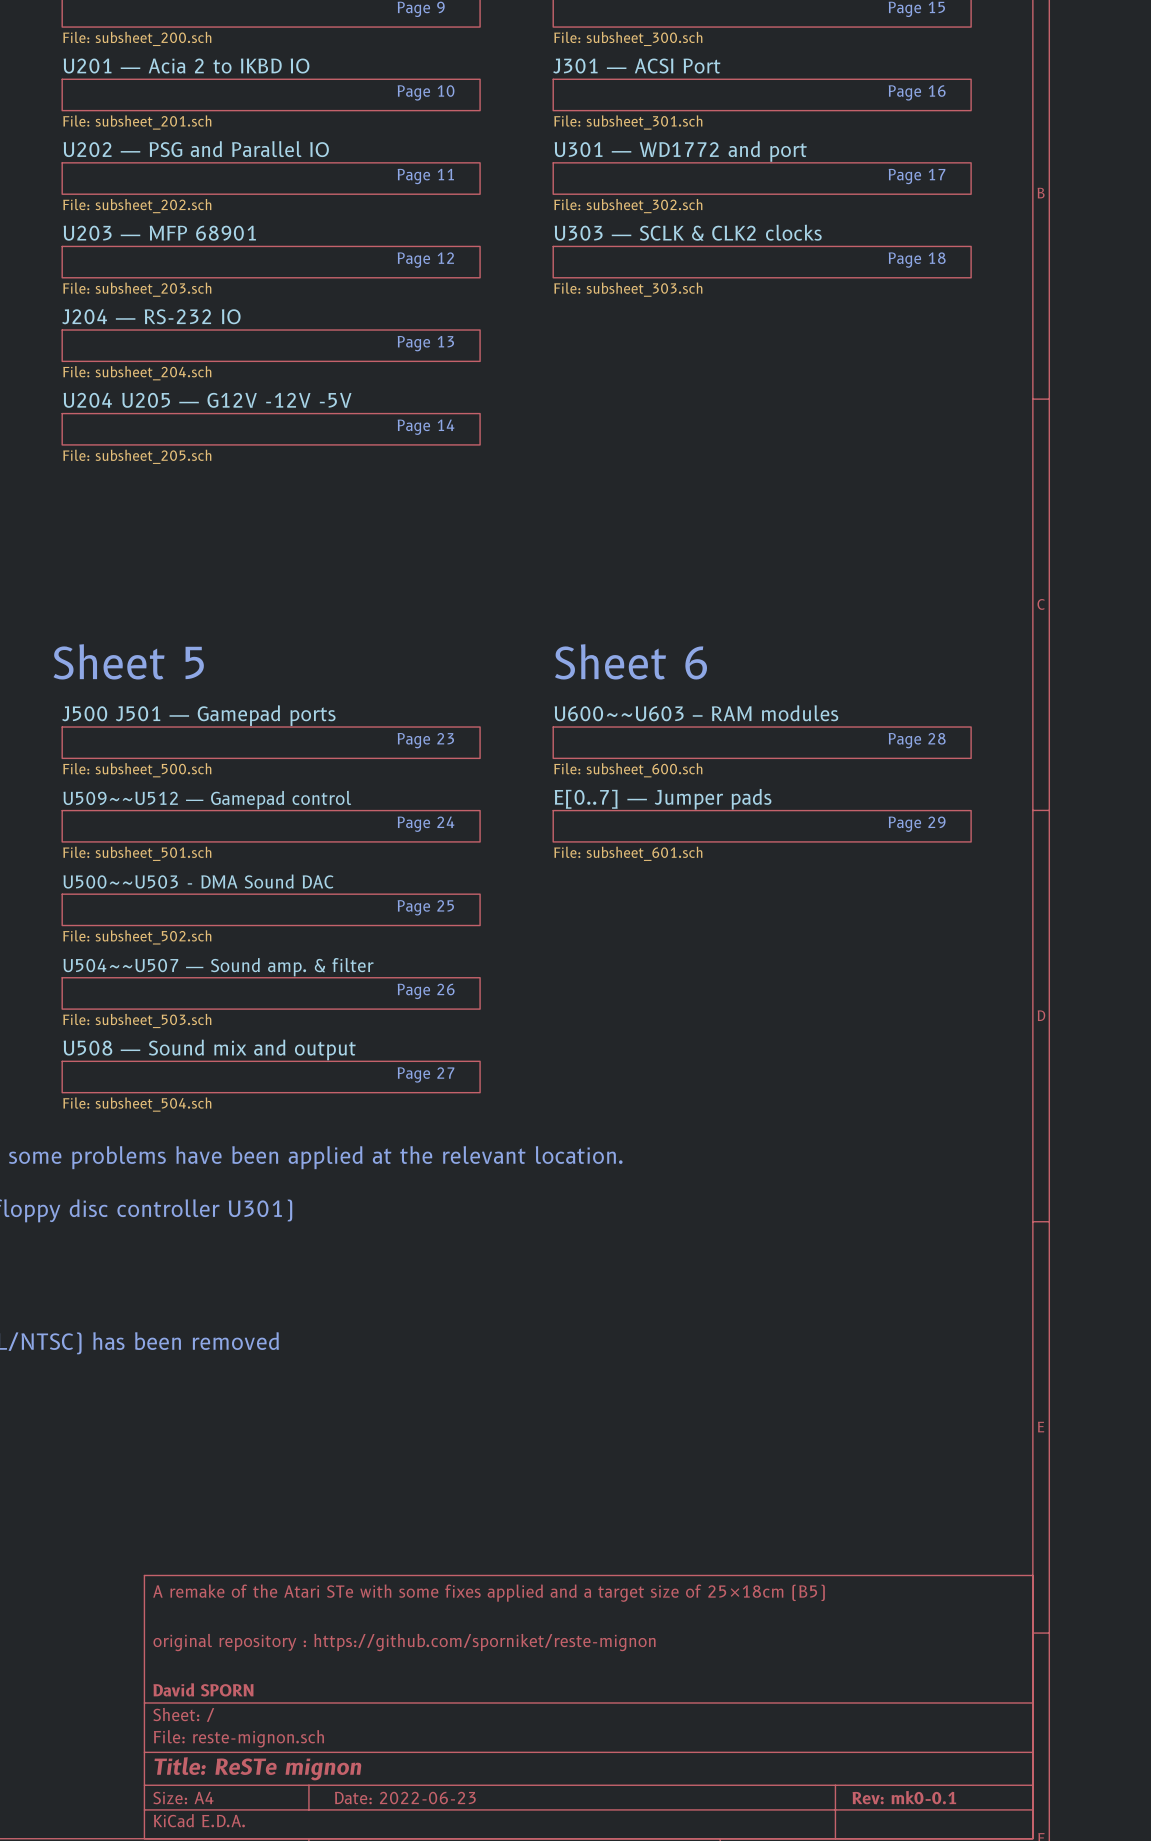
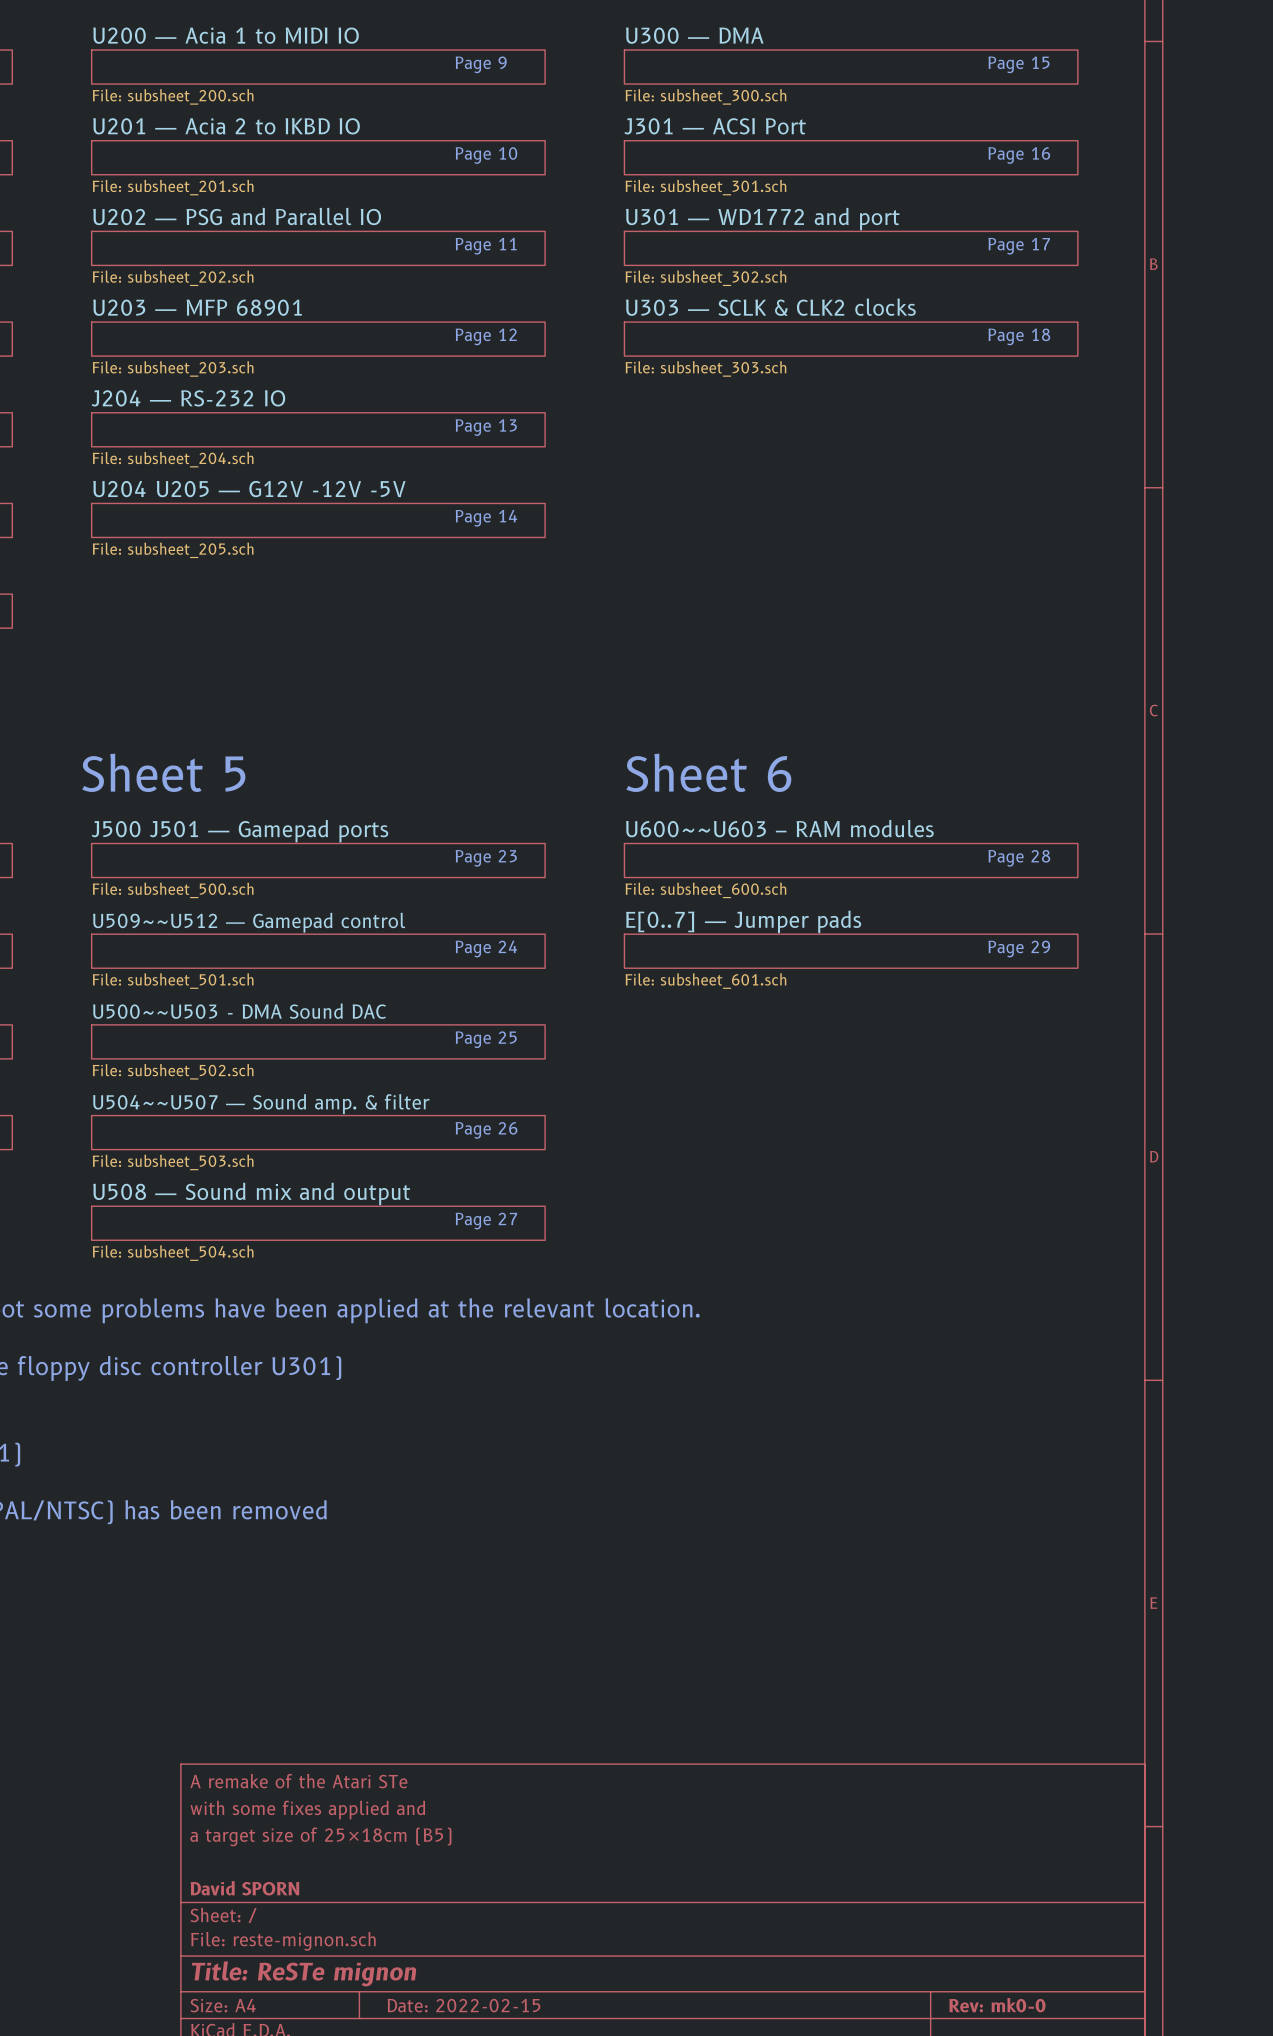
title block: A remake of the Atari STe with some fixes applied and a target size of 25×18cm (B5) (488, 1593) -> A remake of the Atari STe (298, 1781)
title block: none -> with some fixes applied and (307, 1810)
title block: original repository : https://github.com/sporniket/reste-mignon (404, 1642) -> a target size of 25×18cm (B5) (320, 1836)
title block: Rev: mk0-0.1 (904, 1797) -> Rev: mk0-0 (997, 2005)
title block: Date: 2022-06-23 (405, 1798) -> Date: 2022-02-15 (464, 2005)

